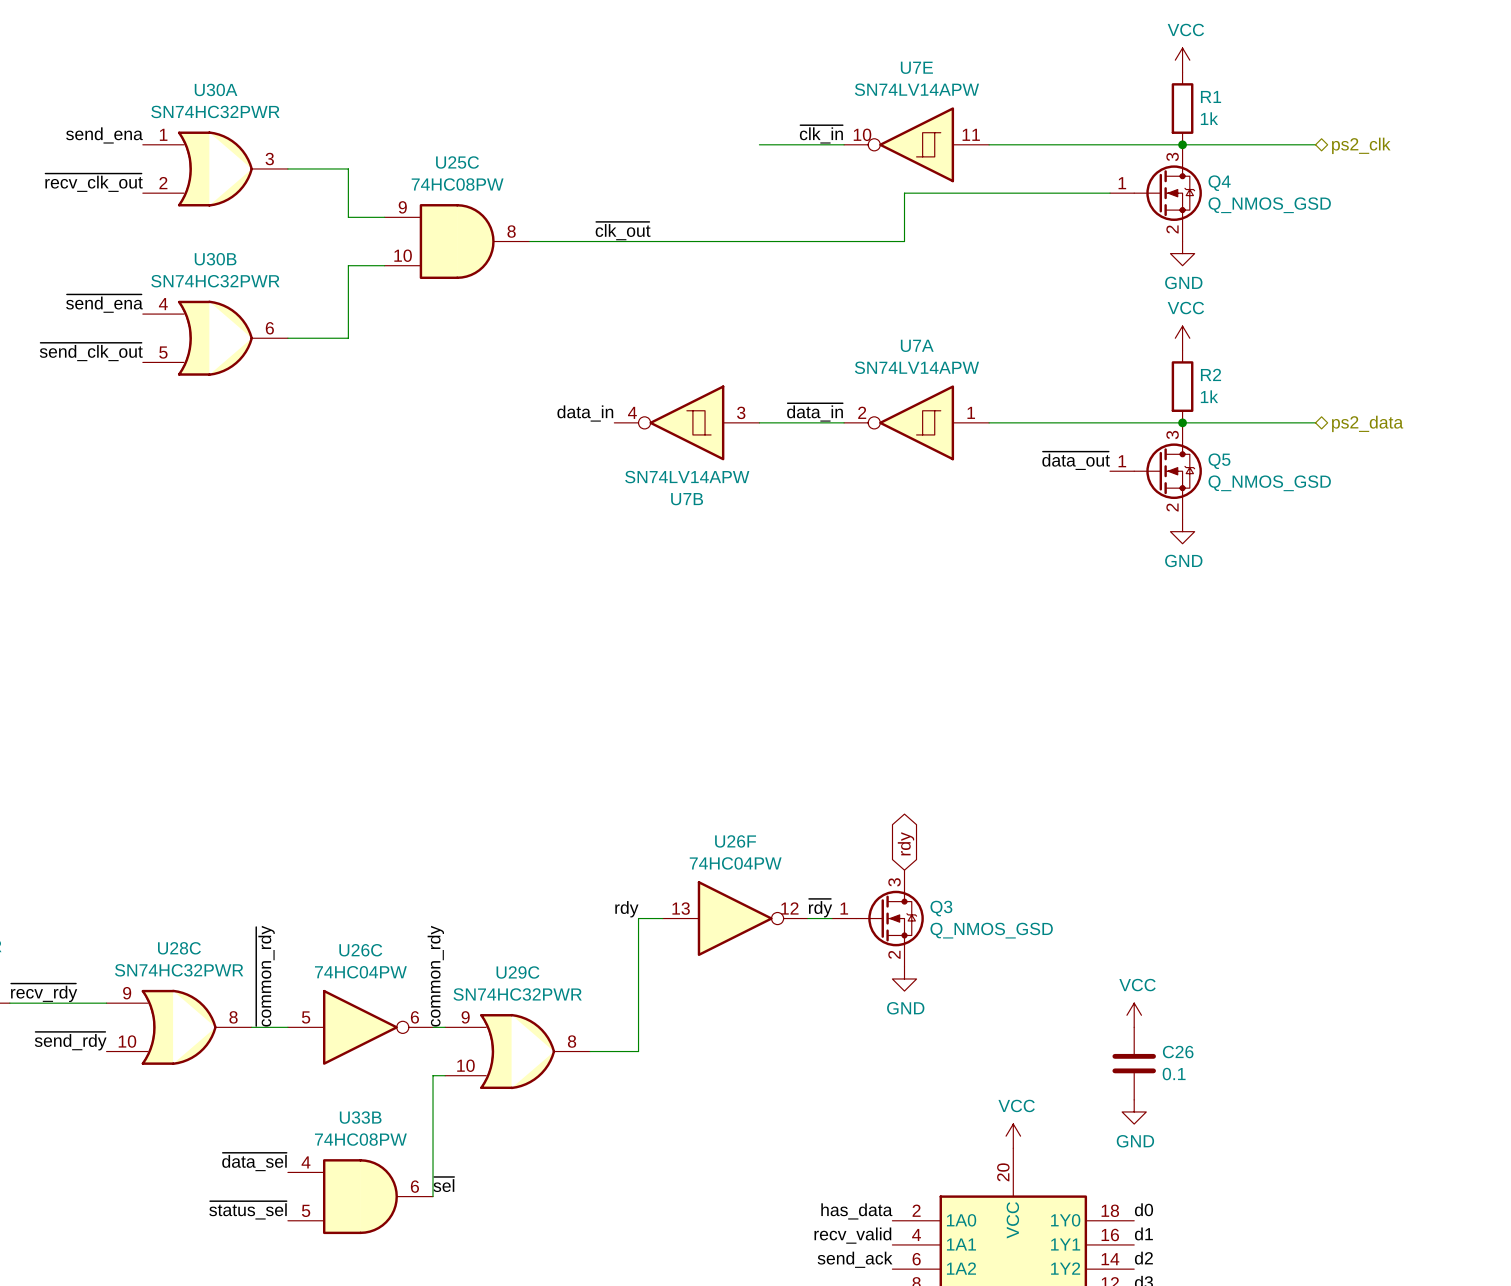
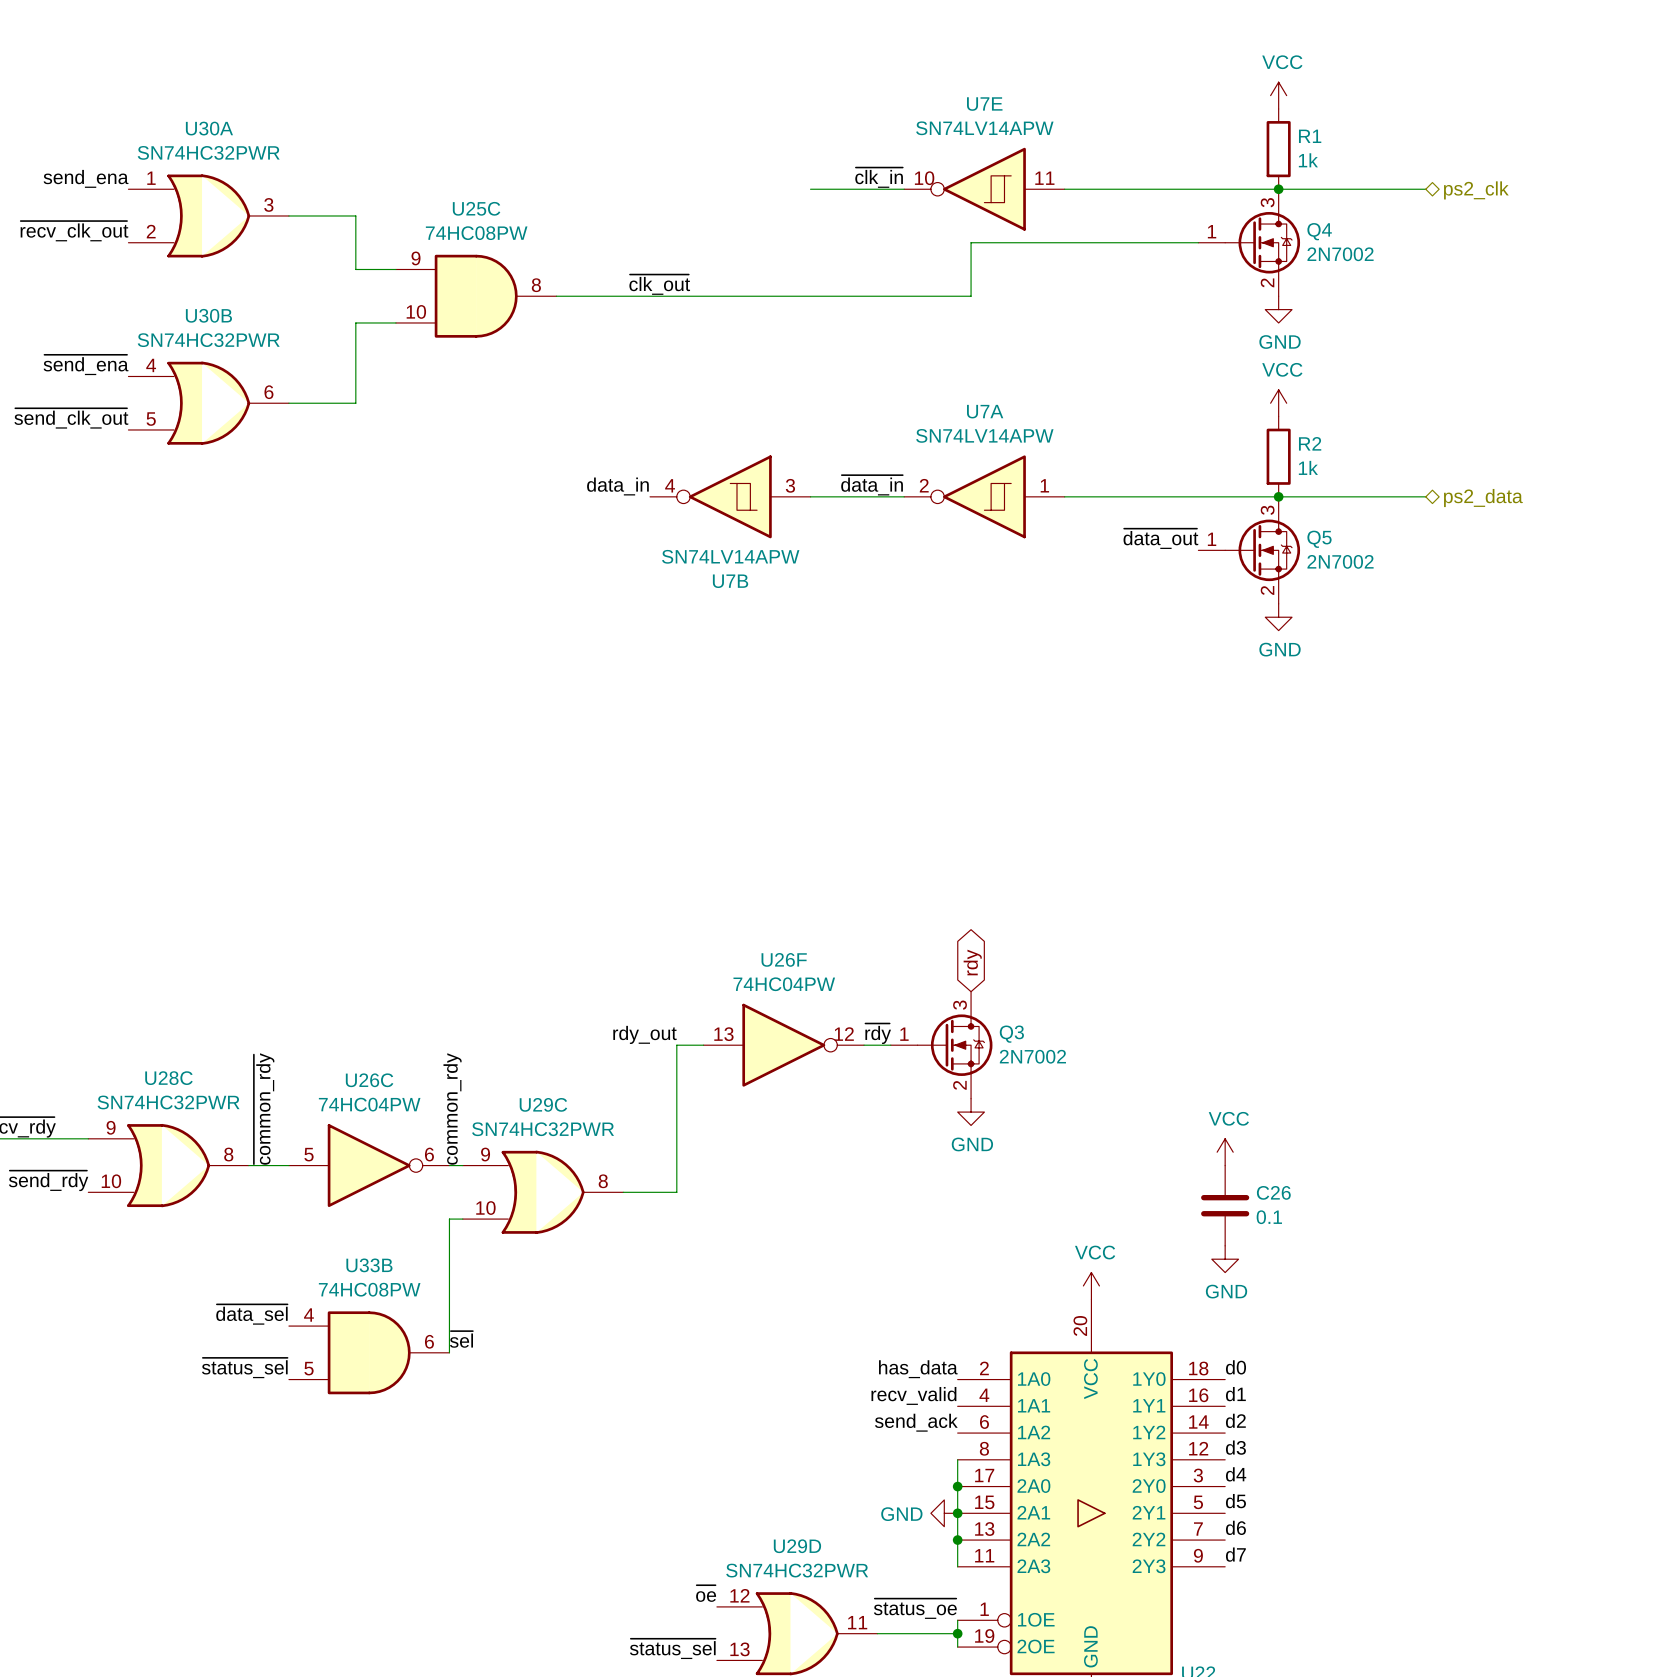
Q4 value: Q_NMOS_GSD (1269, 205) -> 2N7002 (1340, 254)
Q5 value: Q_NMOS_GSD (1269, 483) -> 2N7002 (1340, 561)
label: rdy (626, 909) -> rdy_out (644, 1034)
Q3 value: Q_NMOS_GSD (991, 930) -> 2N7002 (1032, 1056)

